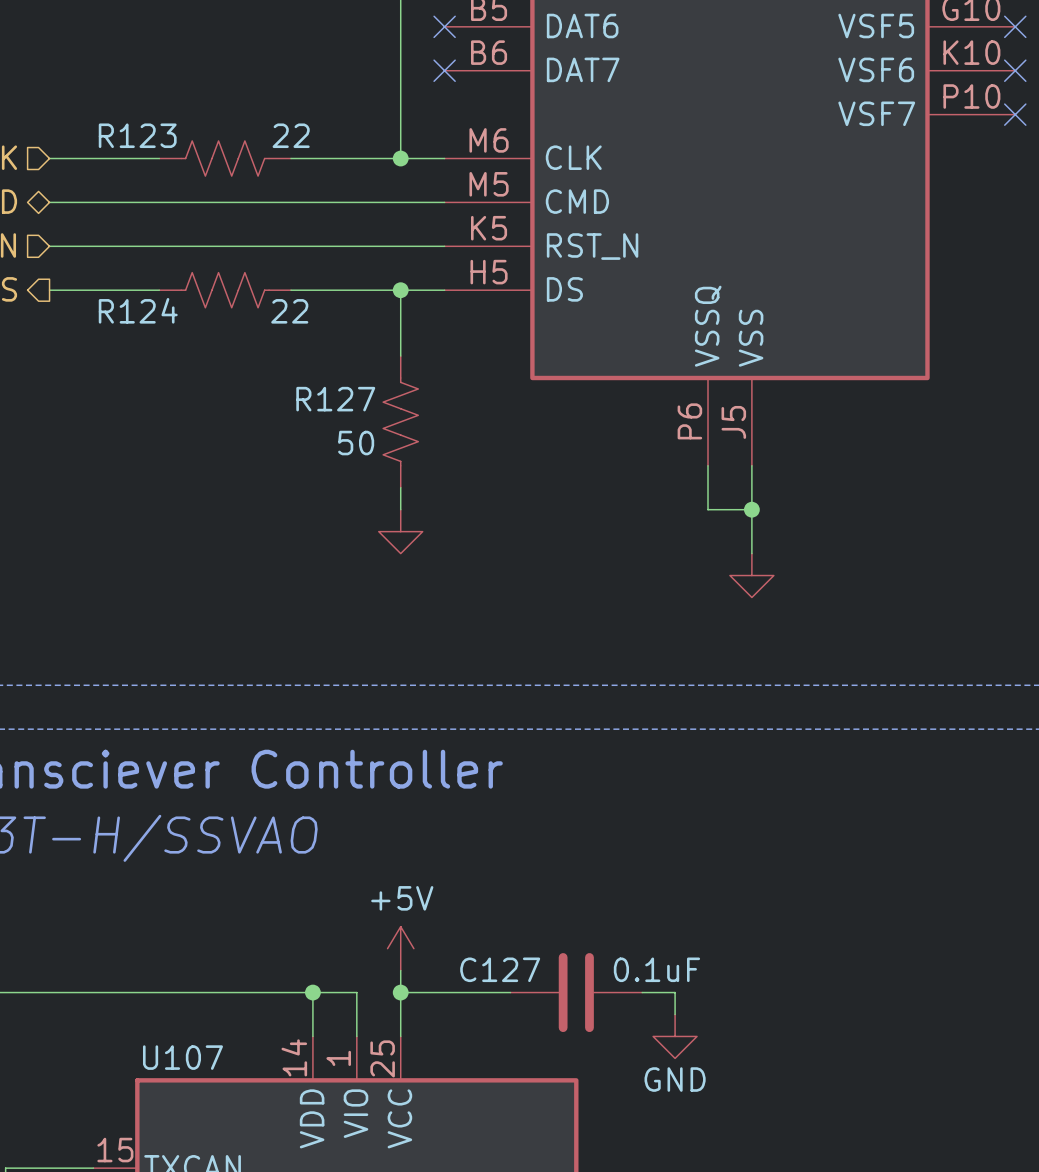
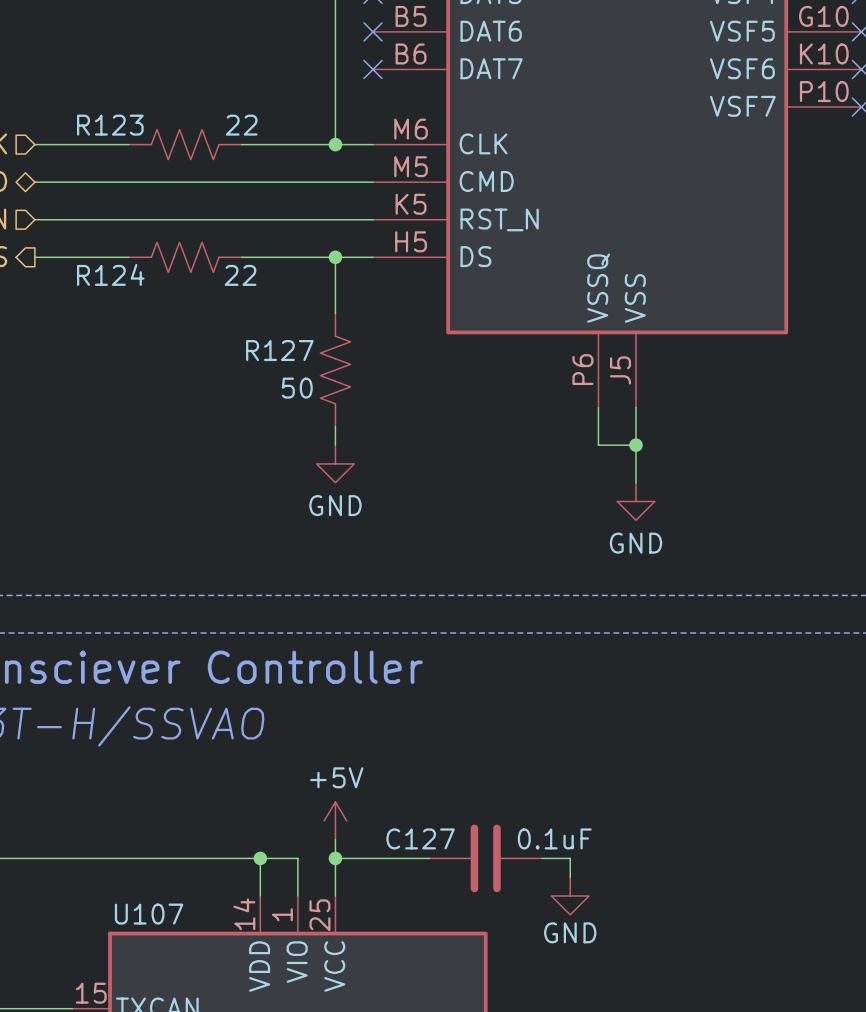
power symbol text: none -> GND (335, 505)
power symbol text: none -> GND (636, 543)

